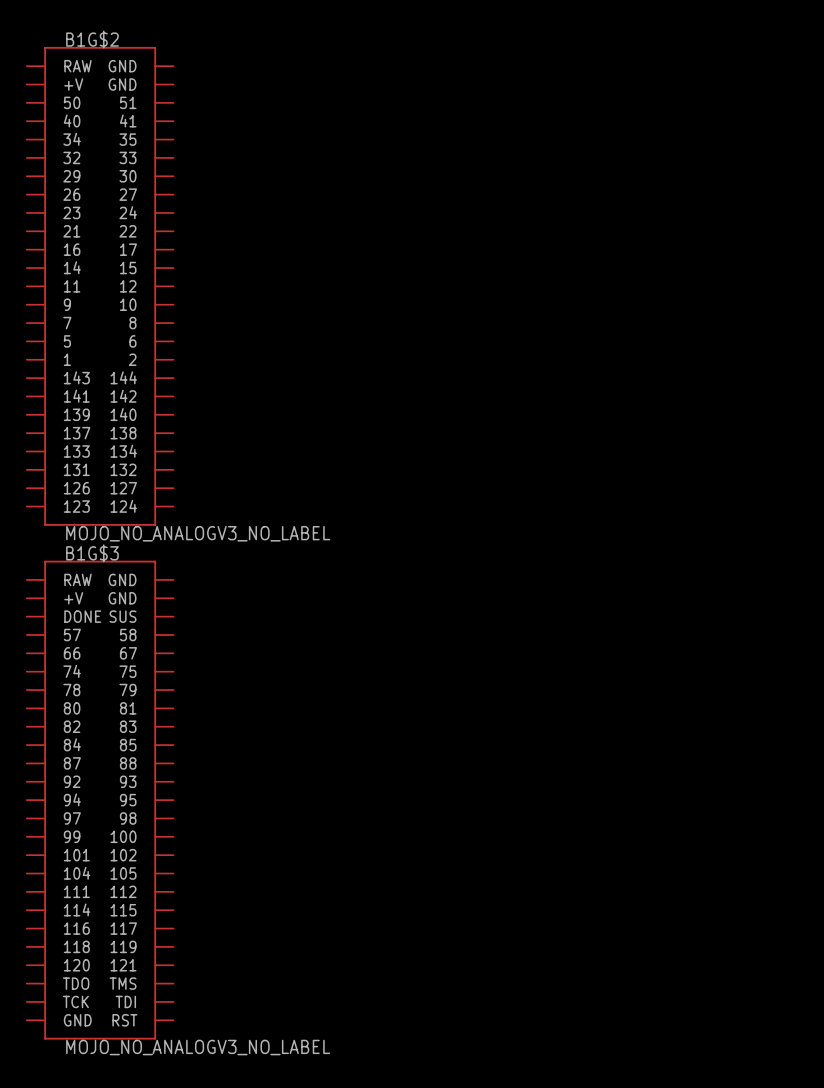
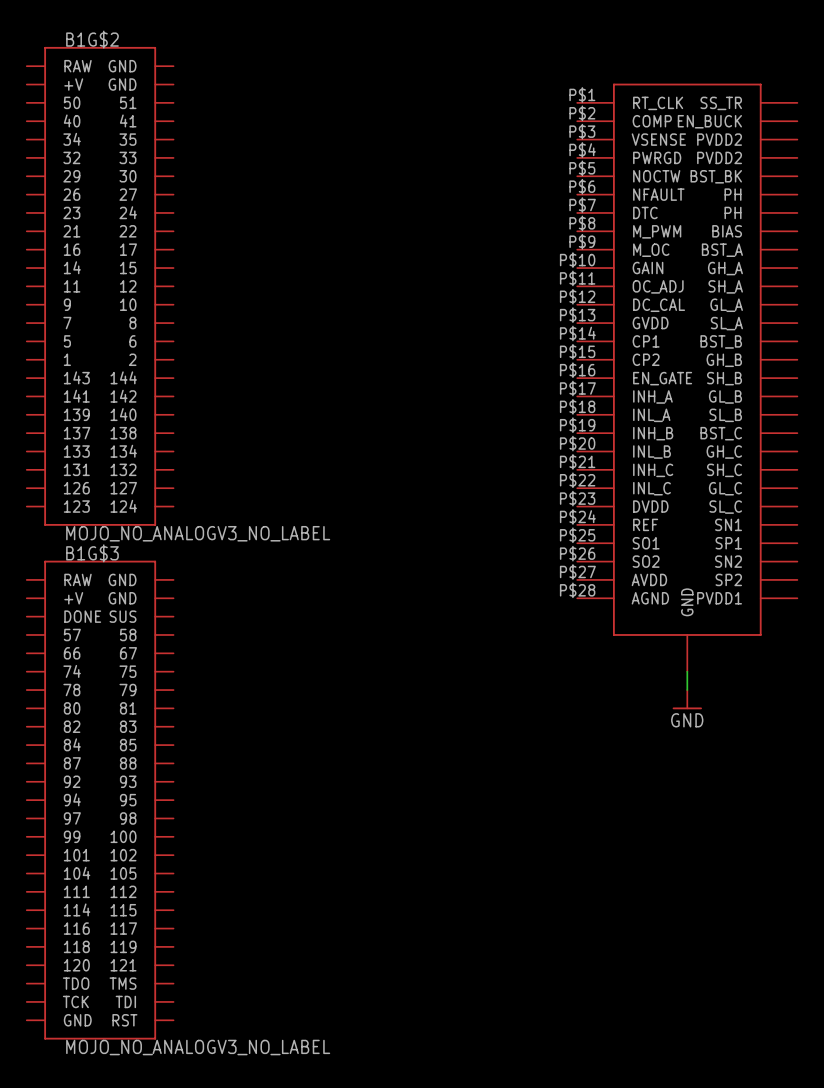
part: none -> (687, 377)
wire: none -> (687, 671) (687, 690)
power symbol: none -> GND (687, 699)

